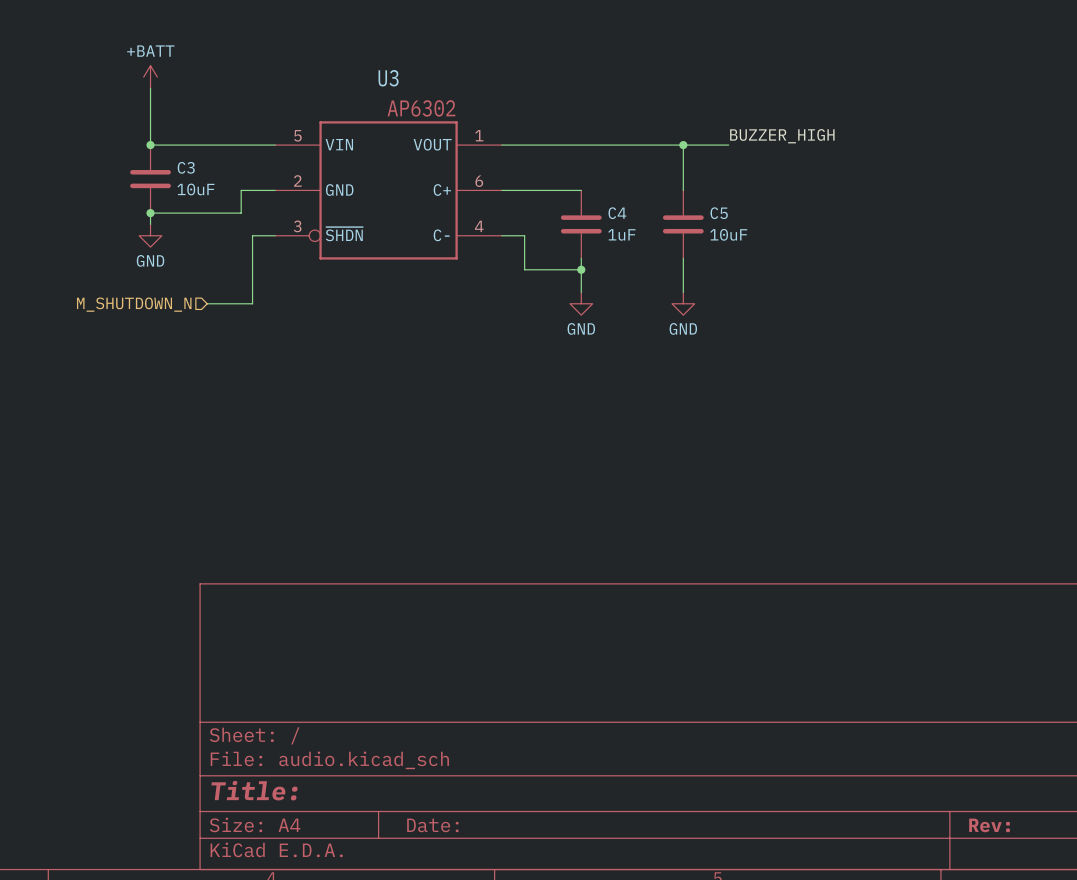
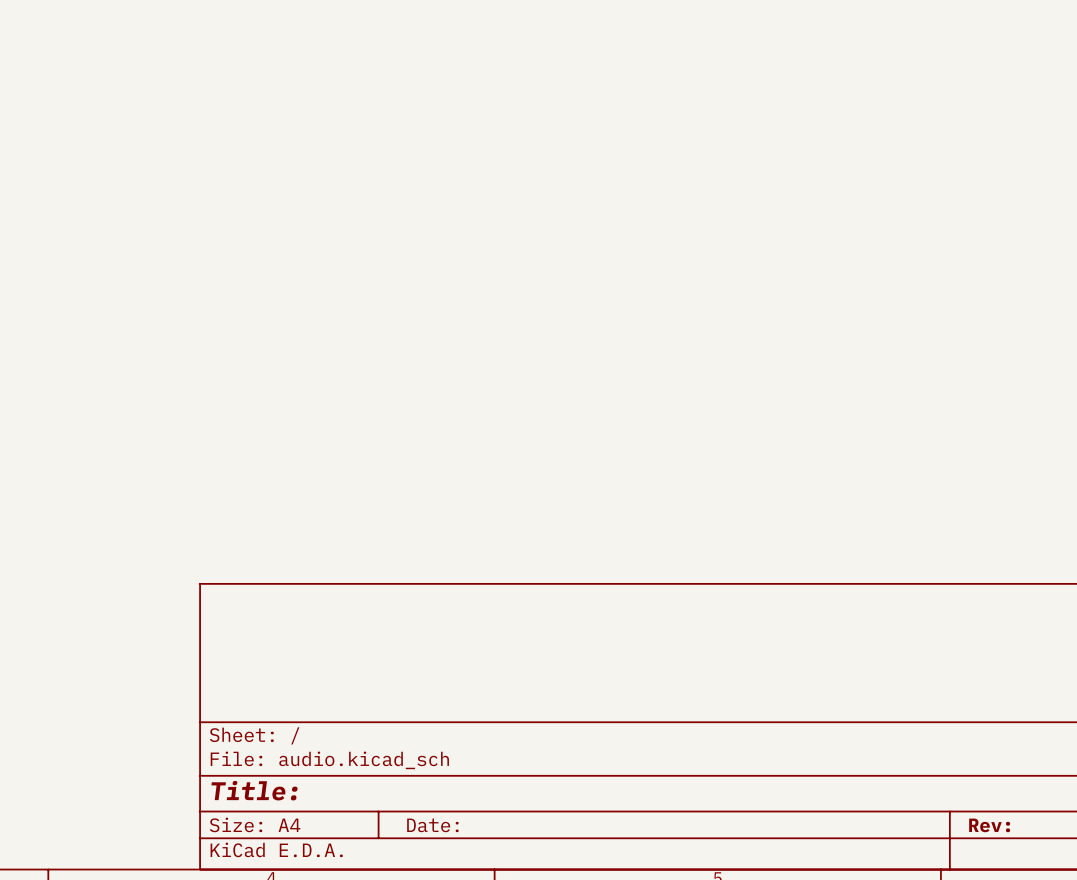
power symbol: +BATT (150, 77) -> none
wire: (150, 88) (150, 145) (275, 145) -> none
label: BUZZER_HIGH (782, 136) -> none
junction: (150, 145) -> none
wire: (501, 145) (728, 145) -> none
wire: (683, 145) (683, 190) -> none
junction: (683, 145) -> none
C3: 10uF (150, 179) -> none
wire: (275, 190) (241, 190) (241, 213) (150, 213) (150, 224) -> none
U3: (388, 190) -> none
wire: (501, 190) (581, 190) -> none
junction: (150, 213) -> none
C4: 1uF (581, 224) -> none
C5: 10uF (683, 224) -> none
power symbol: GND (150, 235) -> none
wire: (275, 235) (252, 235) (252, 303) (207, 303) -> none
wire: (501, 235) (524, 235) (524, 269) (581, 269) -> none
wire: (581, 258) (581, 292) -> none
wire: (683, 258) (683, 292) -> none
junction: (581, 269) -> none
power symbol: GND (581, 303) -> none
power symbol: GND (683, 303) -> none
hierarchical label: M_SHUTDOWN_N (134, 304) -> none

